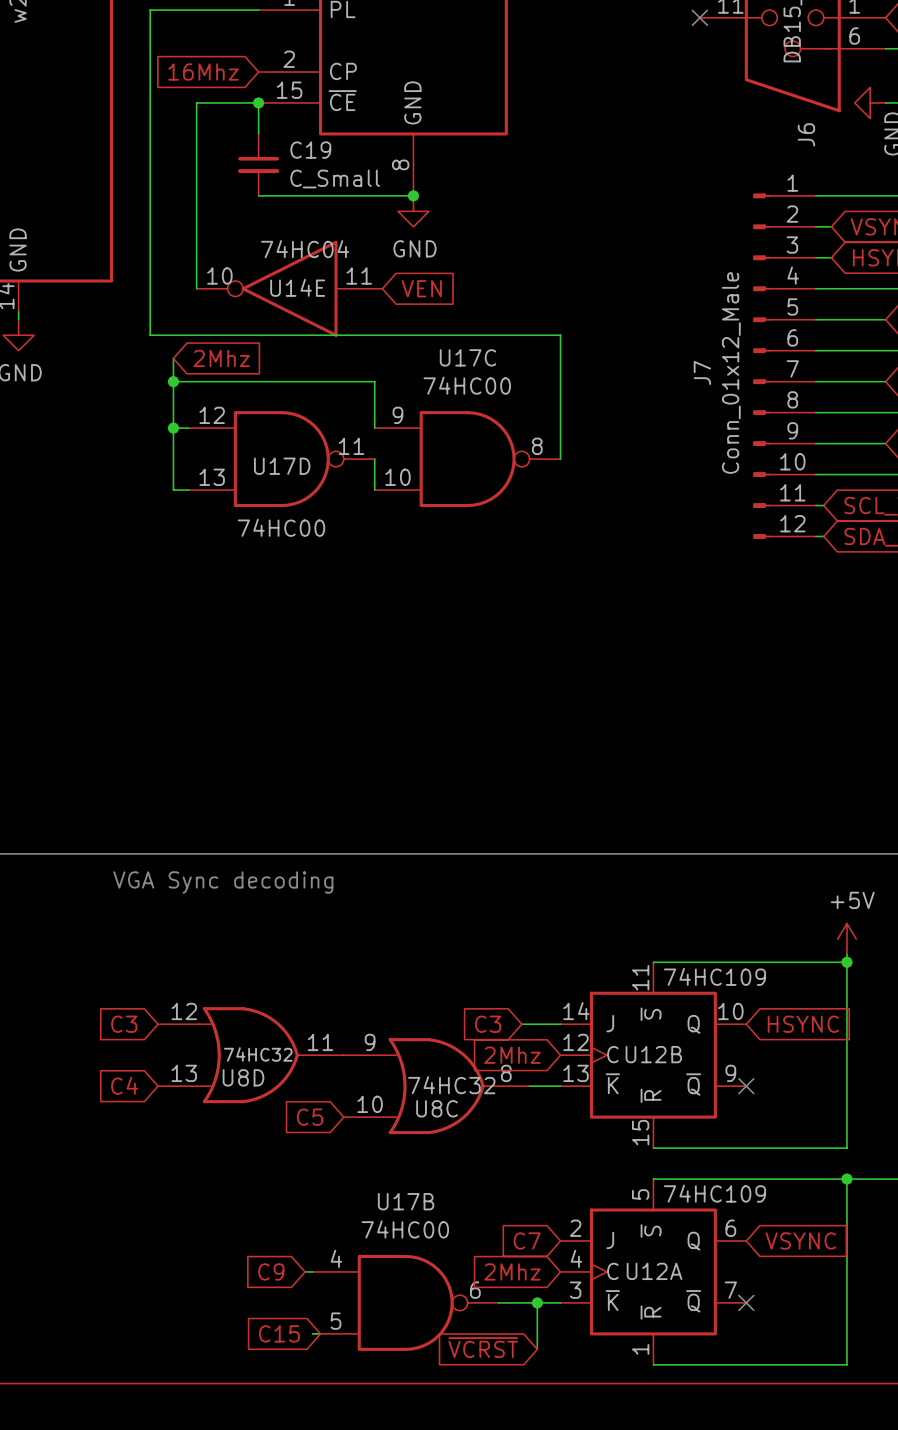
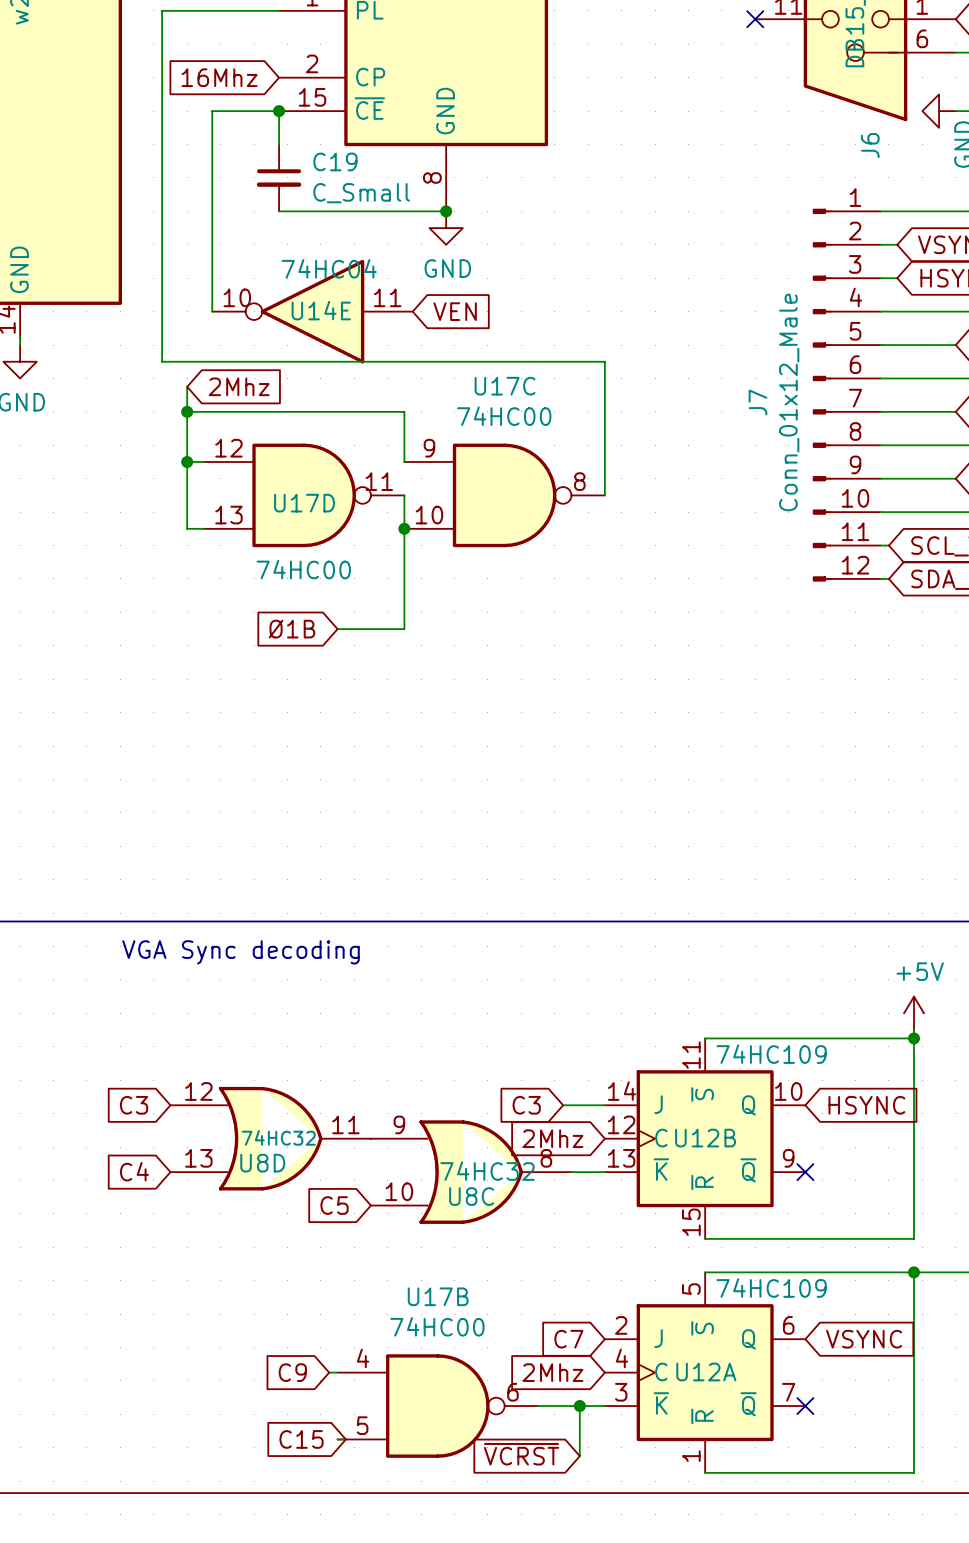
wire: none -> (404, 528) (404, 629) (337, 629)
junction: none -> (404, 528)
global label: none -> Ø1B (291, 629)

